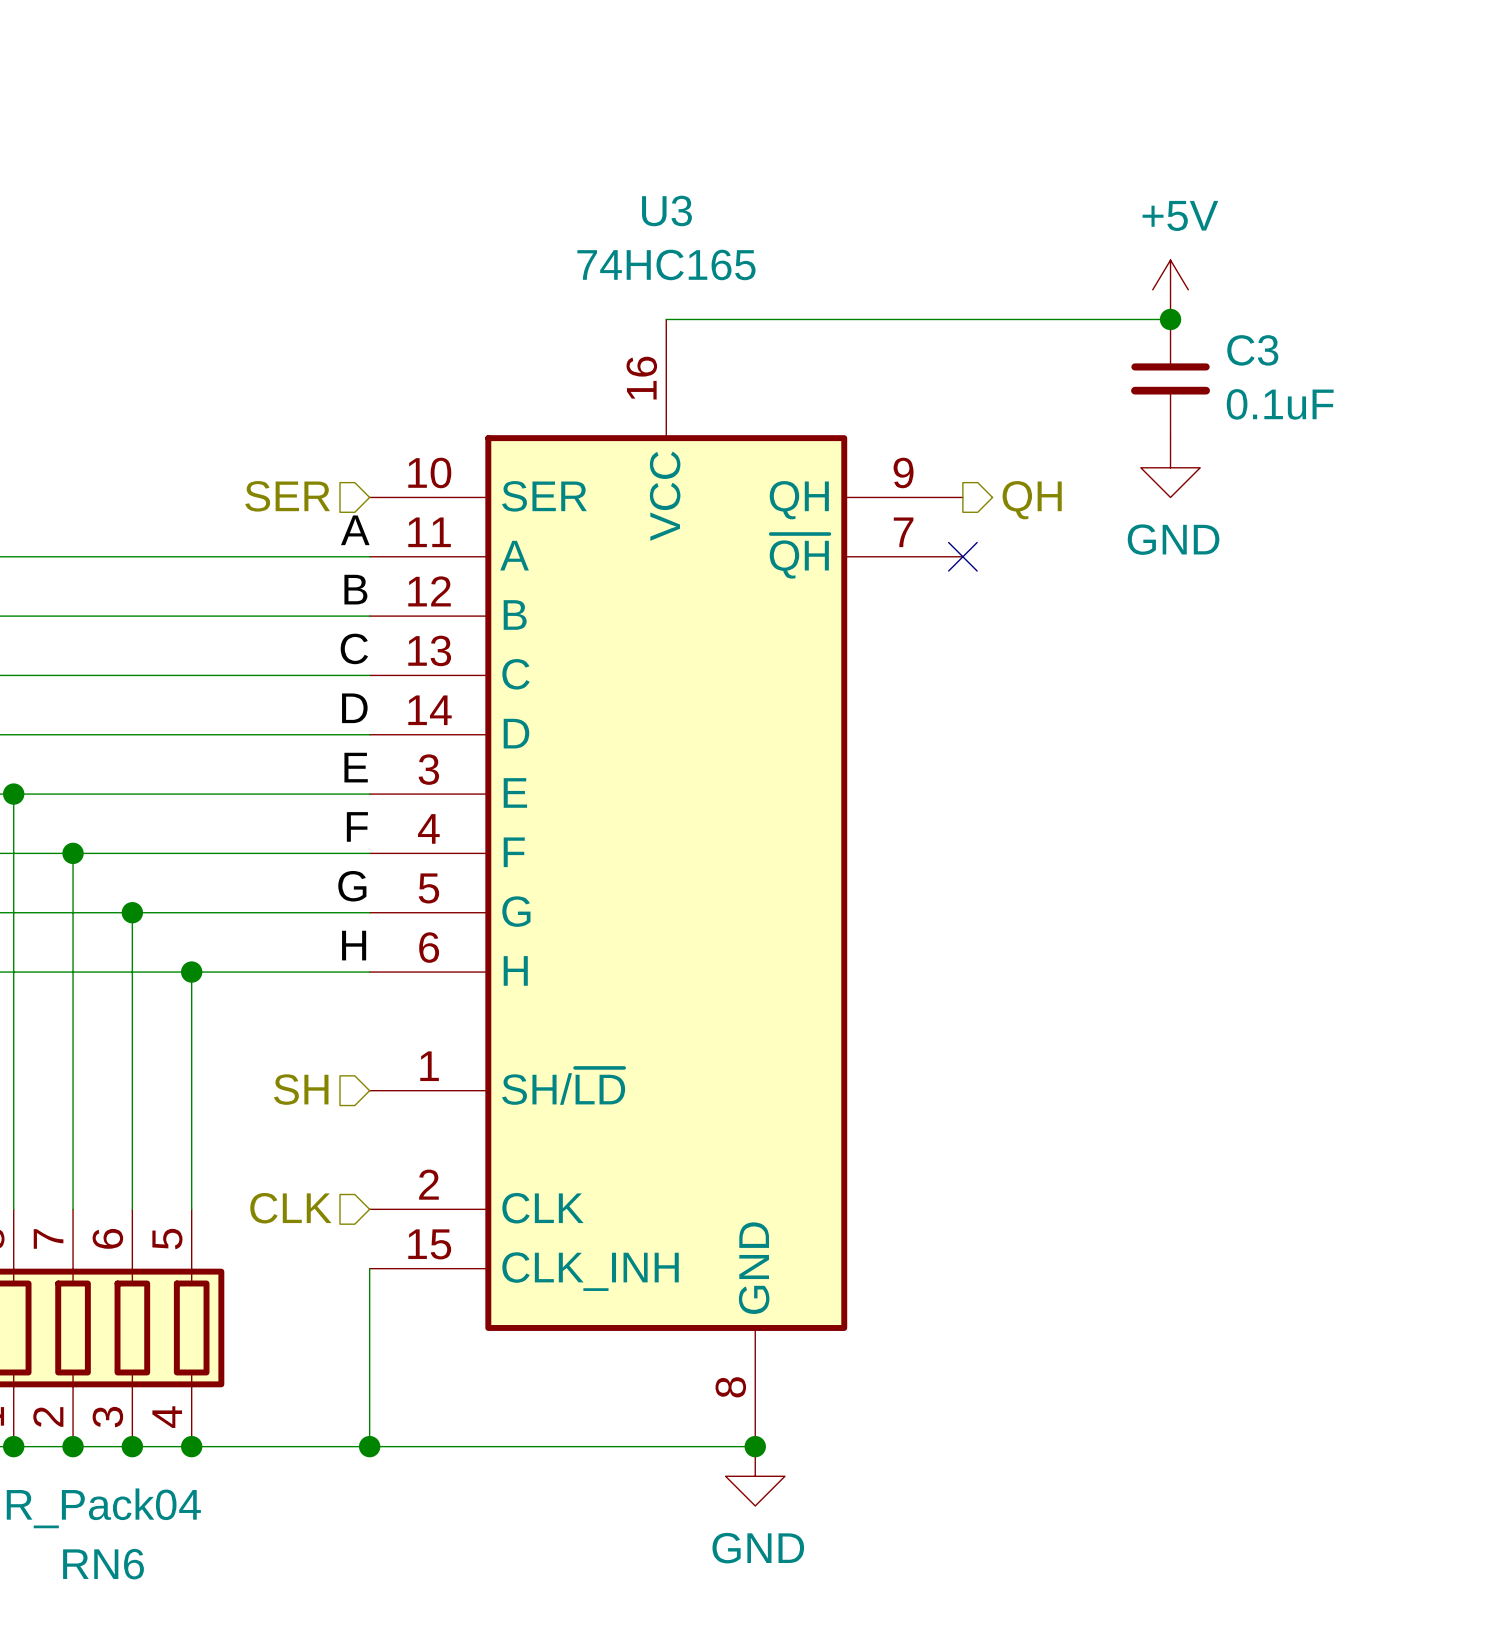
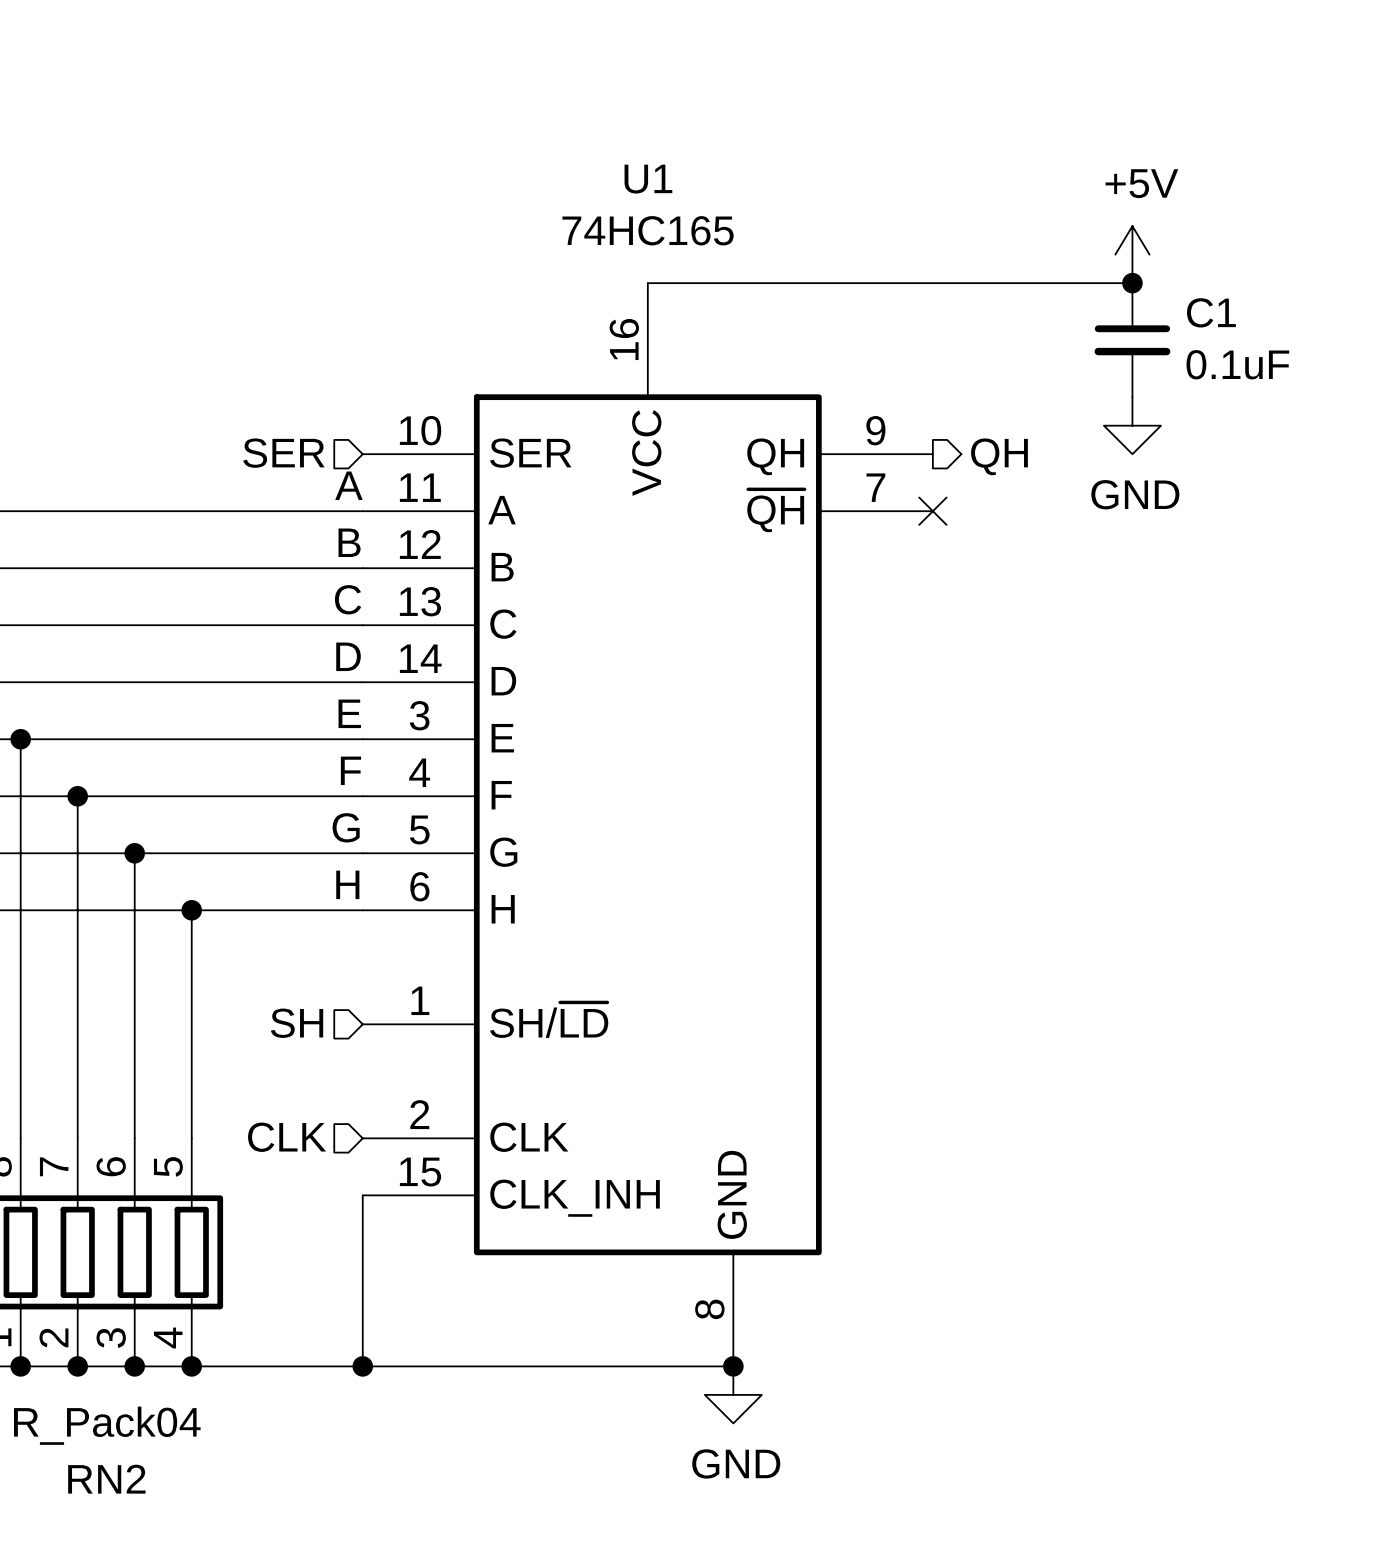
U3 name: U3 (666, 210) -> U1 (648, 179)
C3 name: C3 (1252, 350) -> C1 (1211, 312)
RN6 name: RN6 (103, 1564) -> RN2 (106, 1479)

